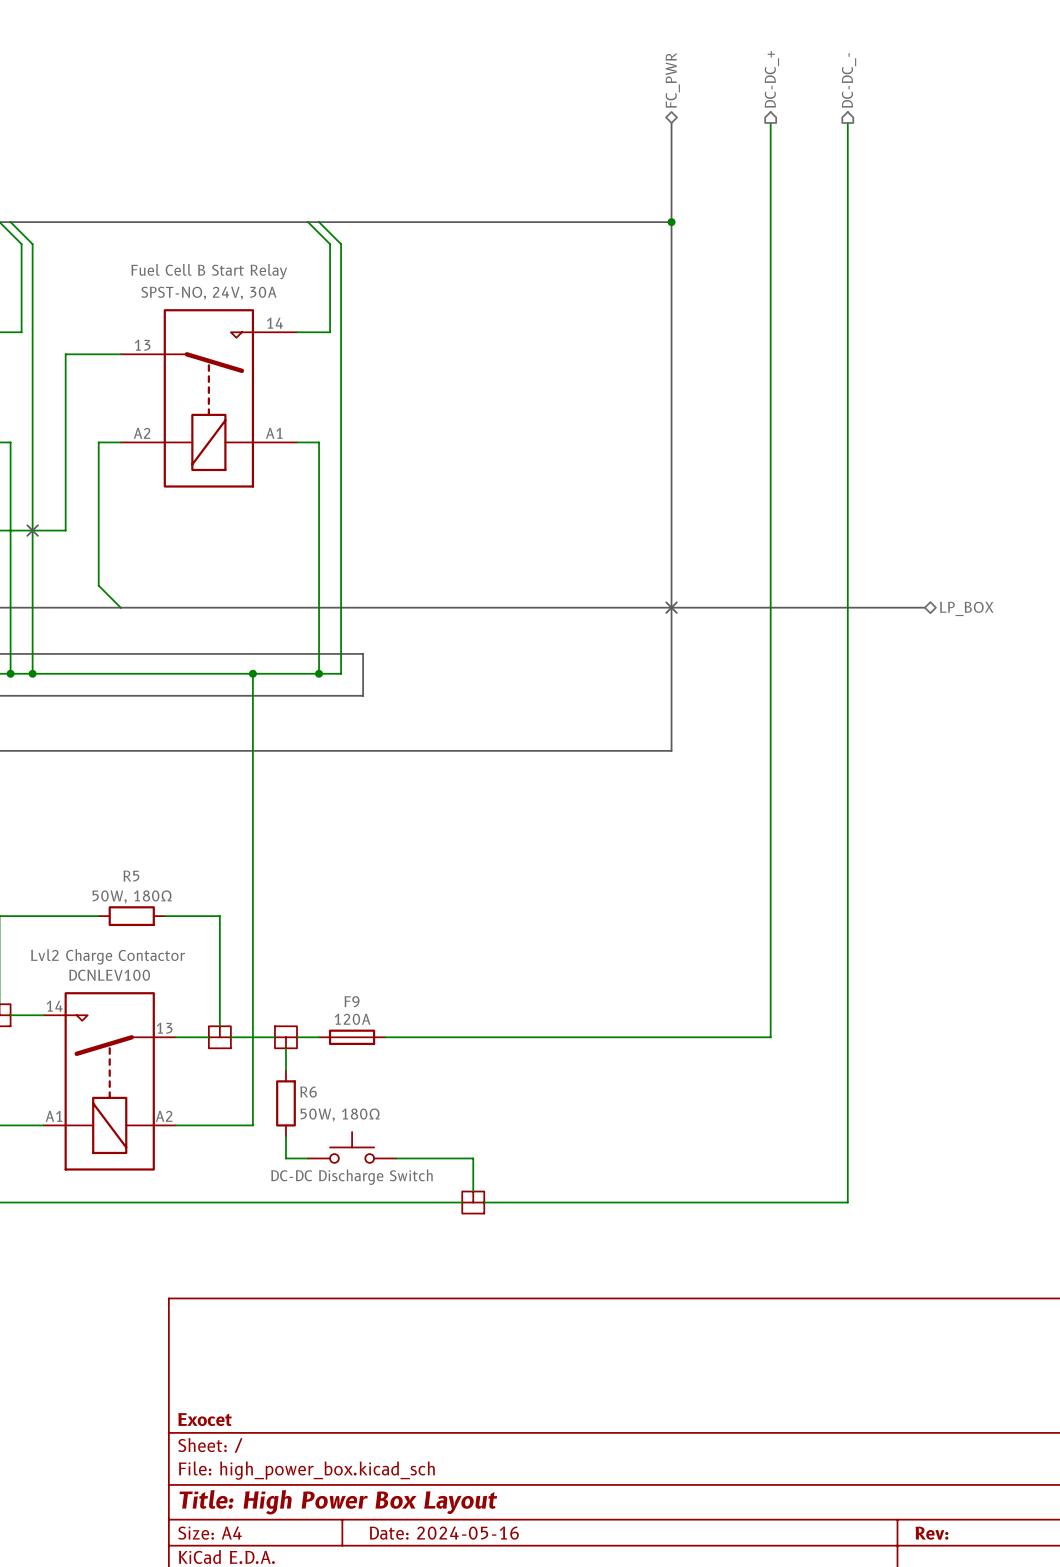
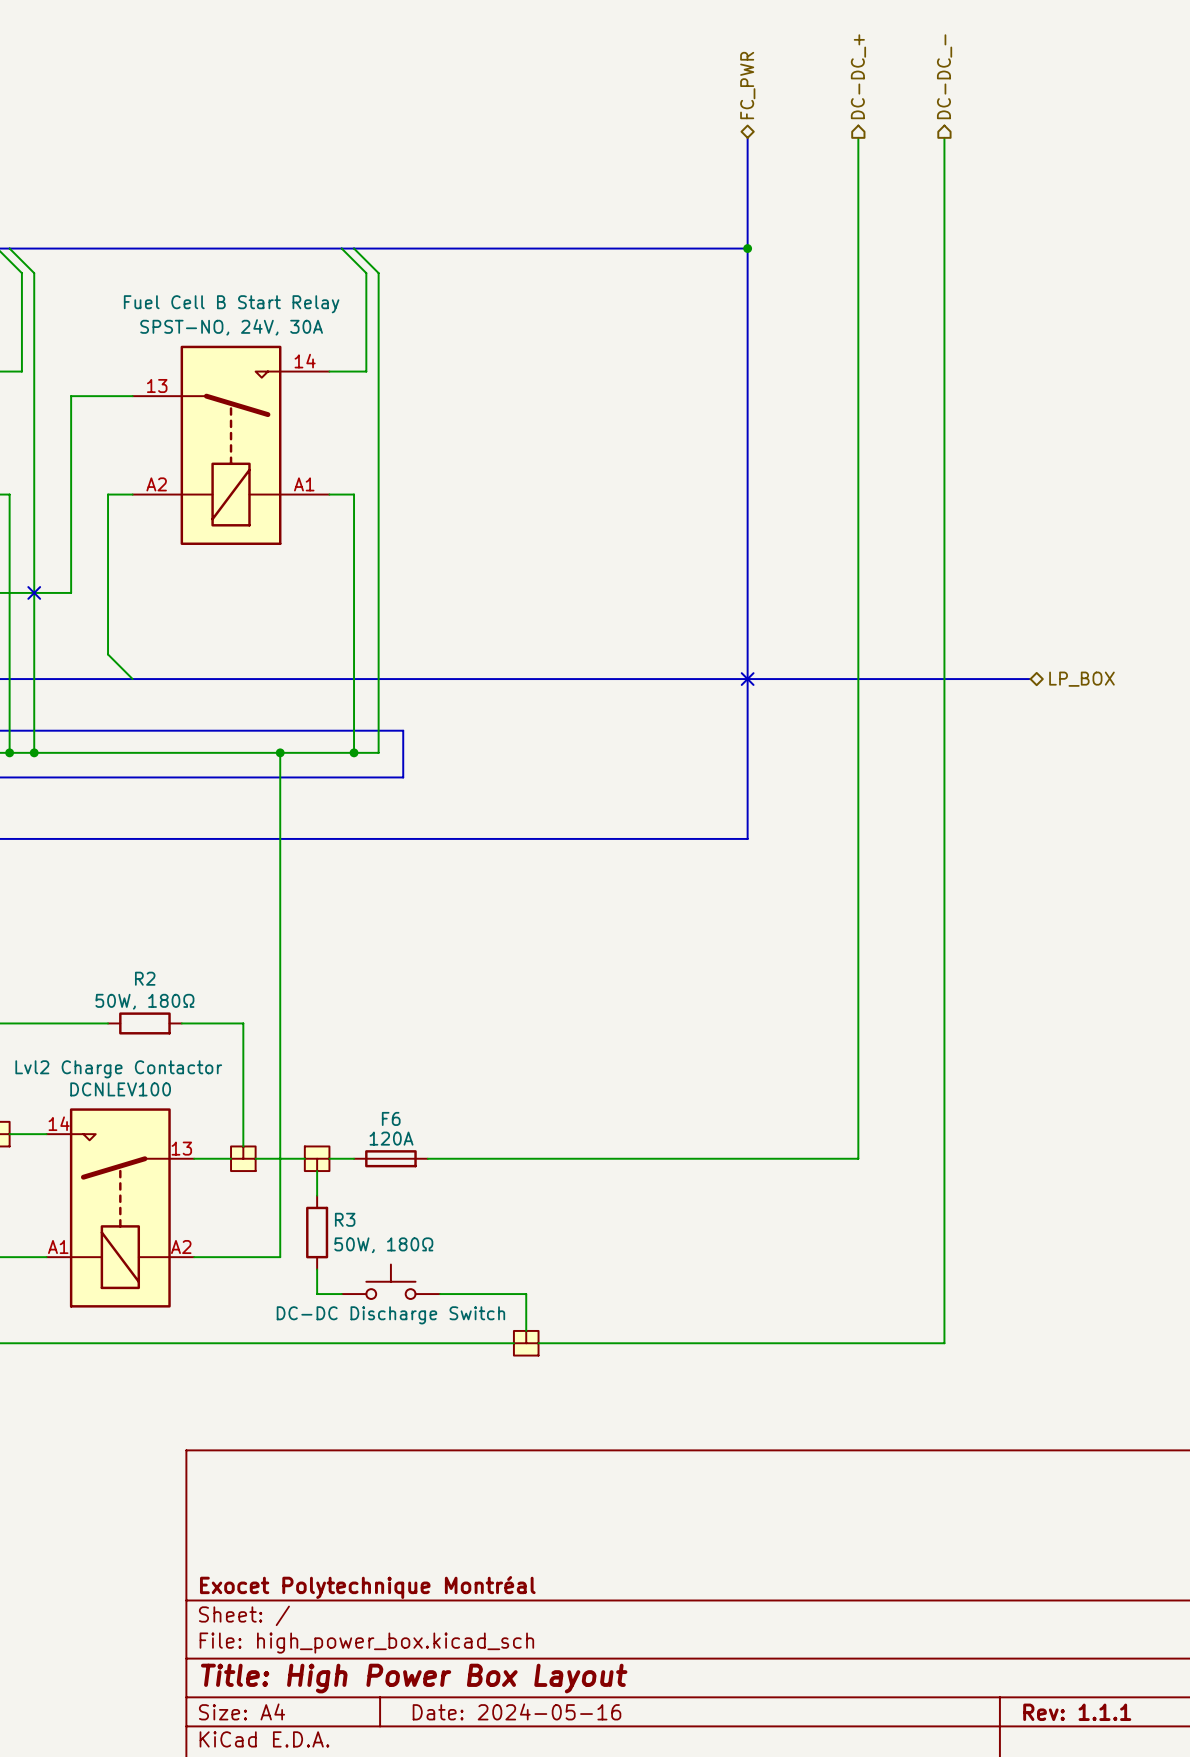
R5 name: R5 (131, 876) -> R2 (145, 978)
F9 name: F9 (352, 1001) -> F6 (391, 1118)
R6 name: R6 (308, 1092) -> R3 (345, 1219)
title block: Exocet (204, 1419) -> Exocet Polytechnique Montréal (367, 1587)
title block: Rev: (931, 1533) -> Rev: 1.1.1 (1077, 1712)

